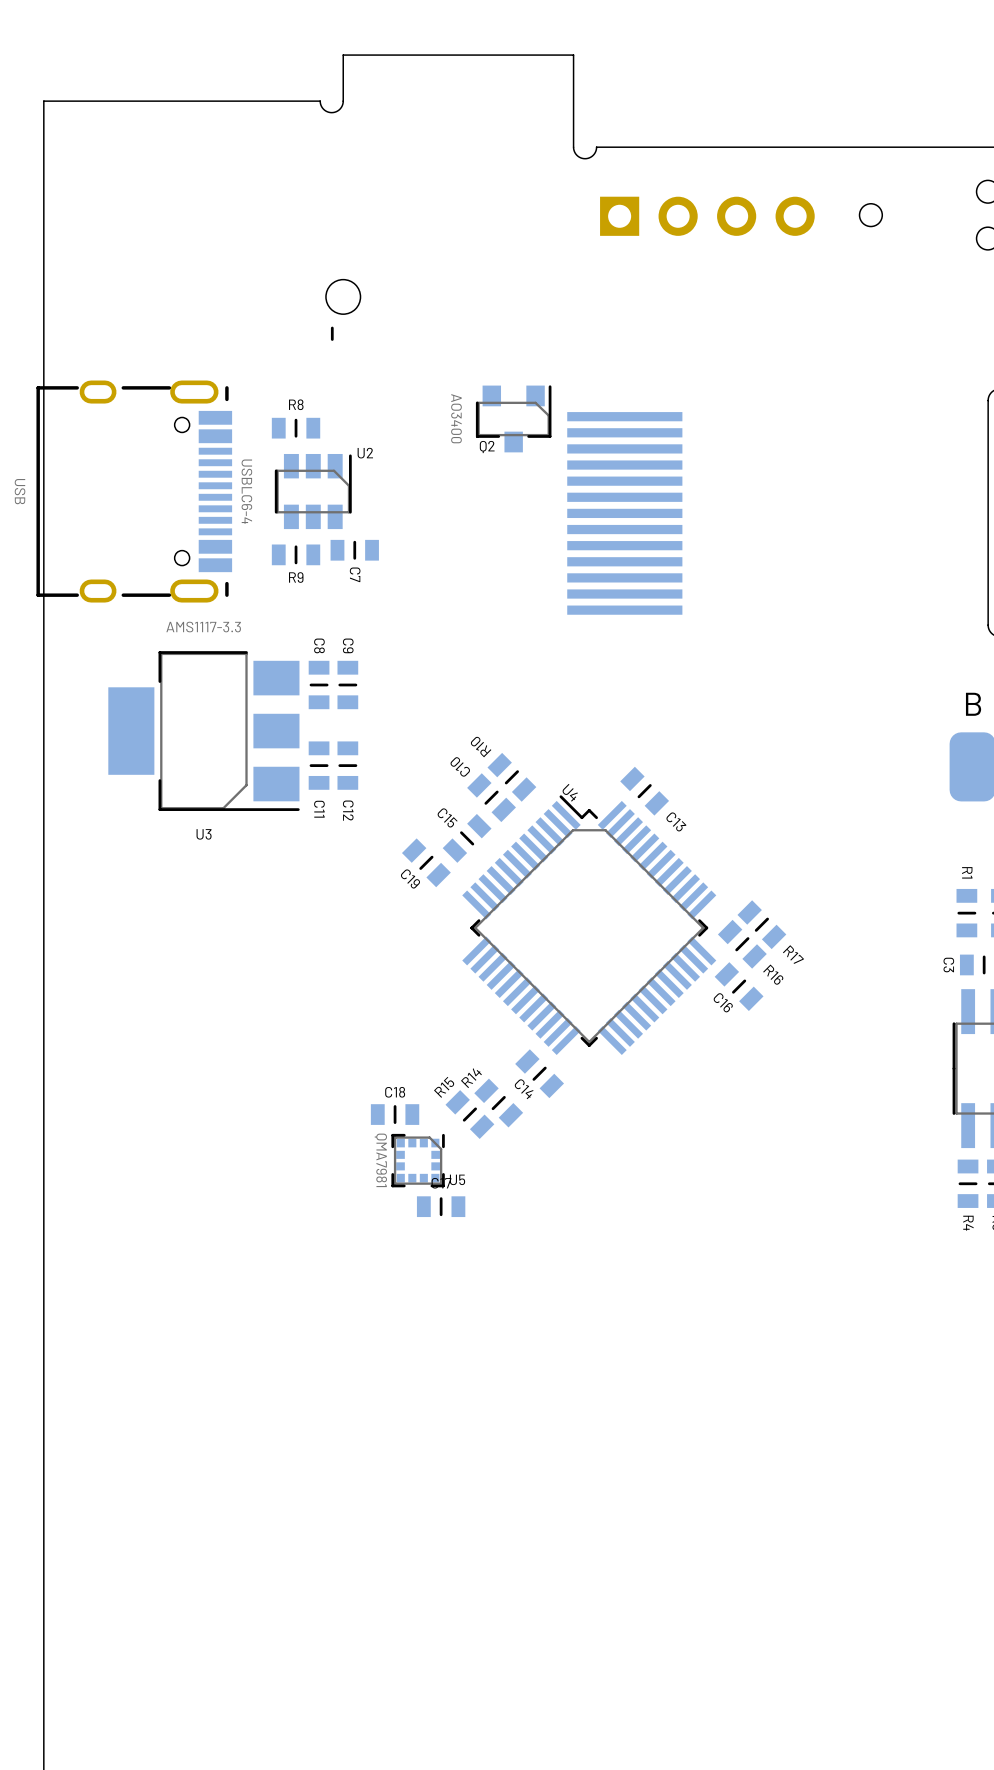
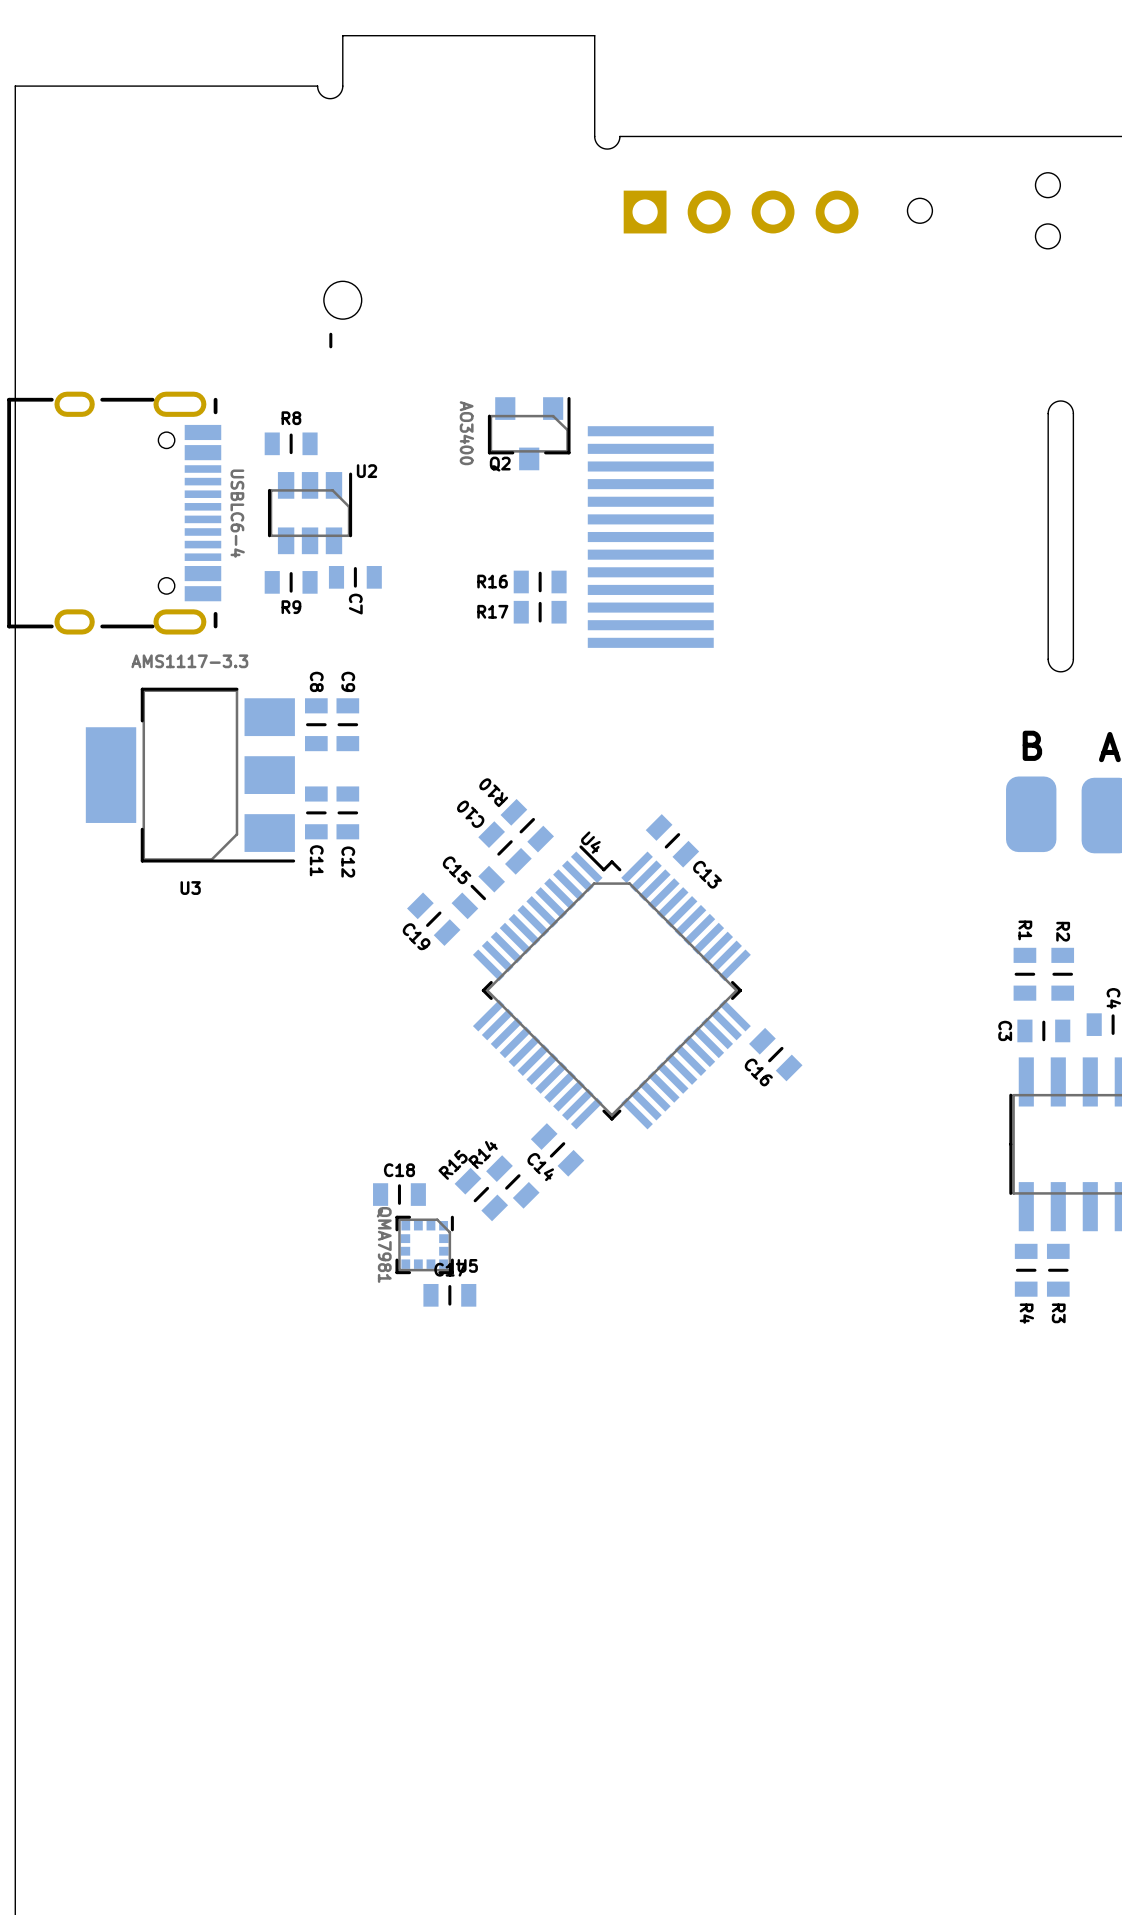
R17 rotation: 0° (761, 924) -> 45° counterclockwise (540, 612)
R17 position: (761, 924) -> (540, 612)
R16 rotation: 0° (742, 944) -> 45° counterclockwise (540, 581)
R16 position: (742, 944) -> (540, 581)
R17 name position: R17 (793, 954) -> R17 (492, 611)
R16 name position: R16 (773, 974) -> R16 (492, 581)

